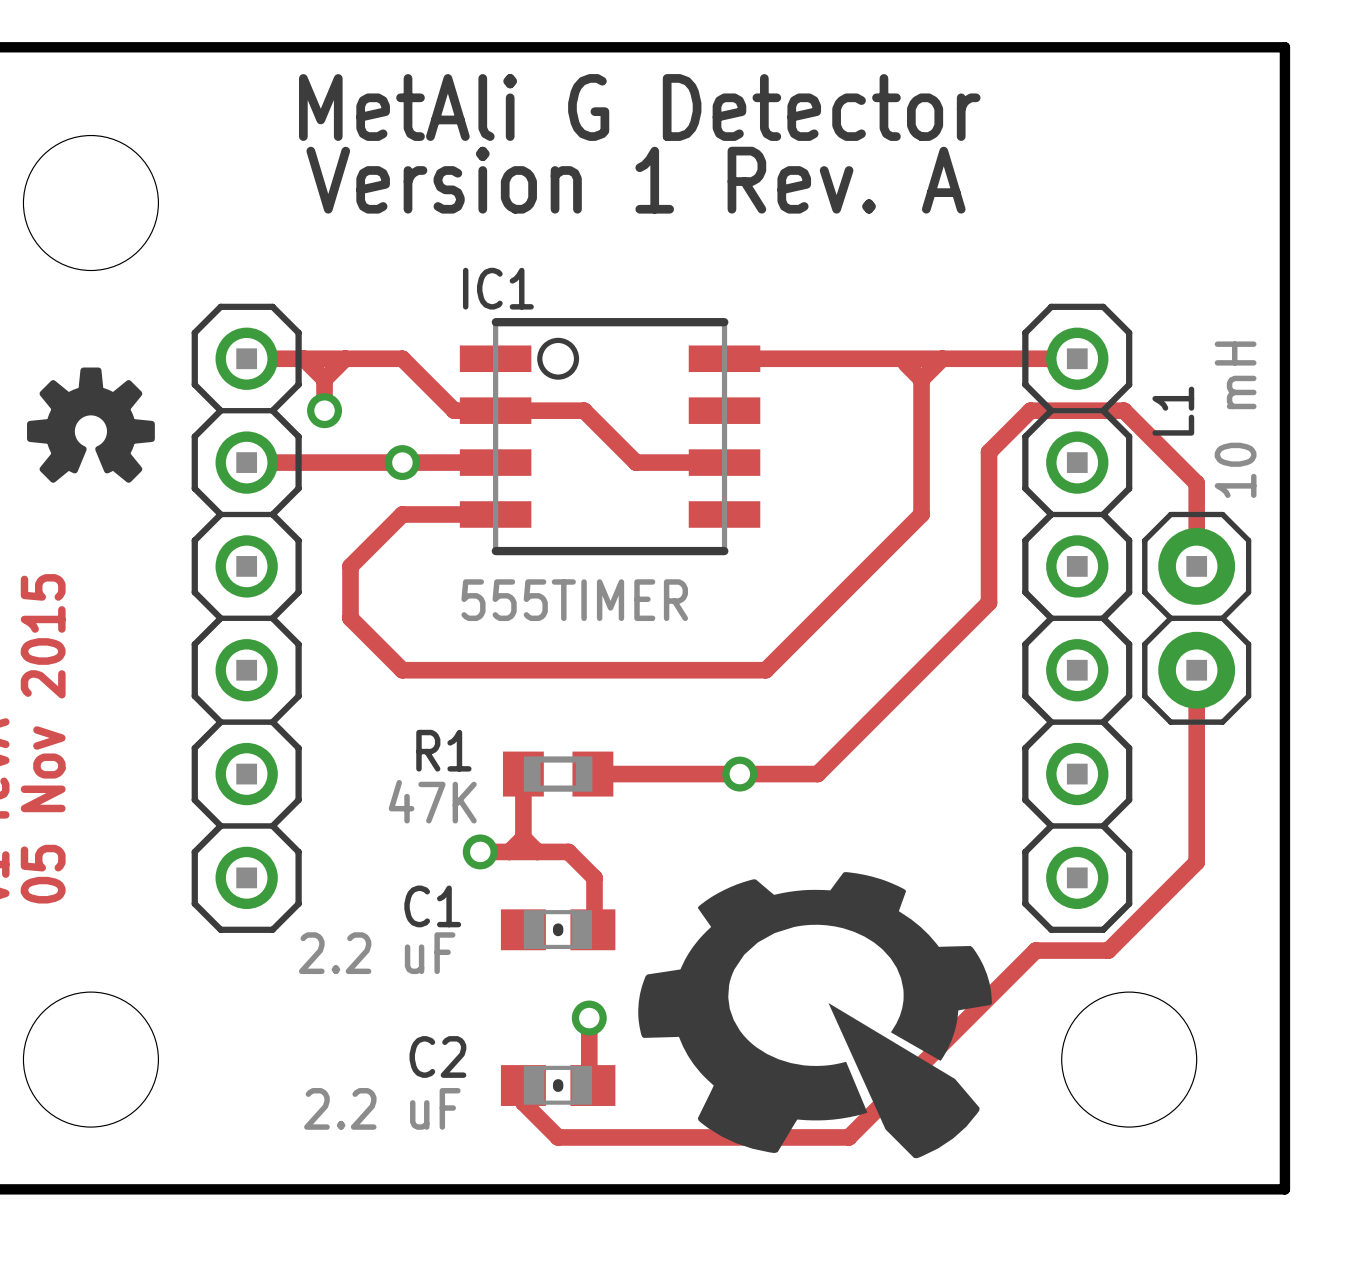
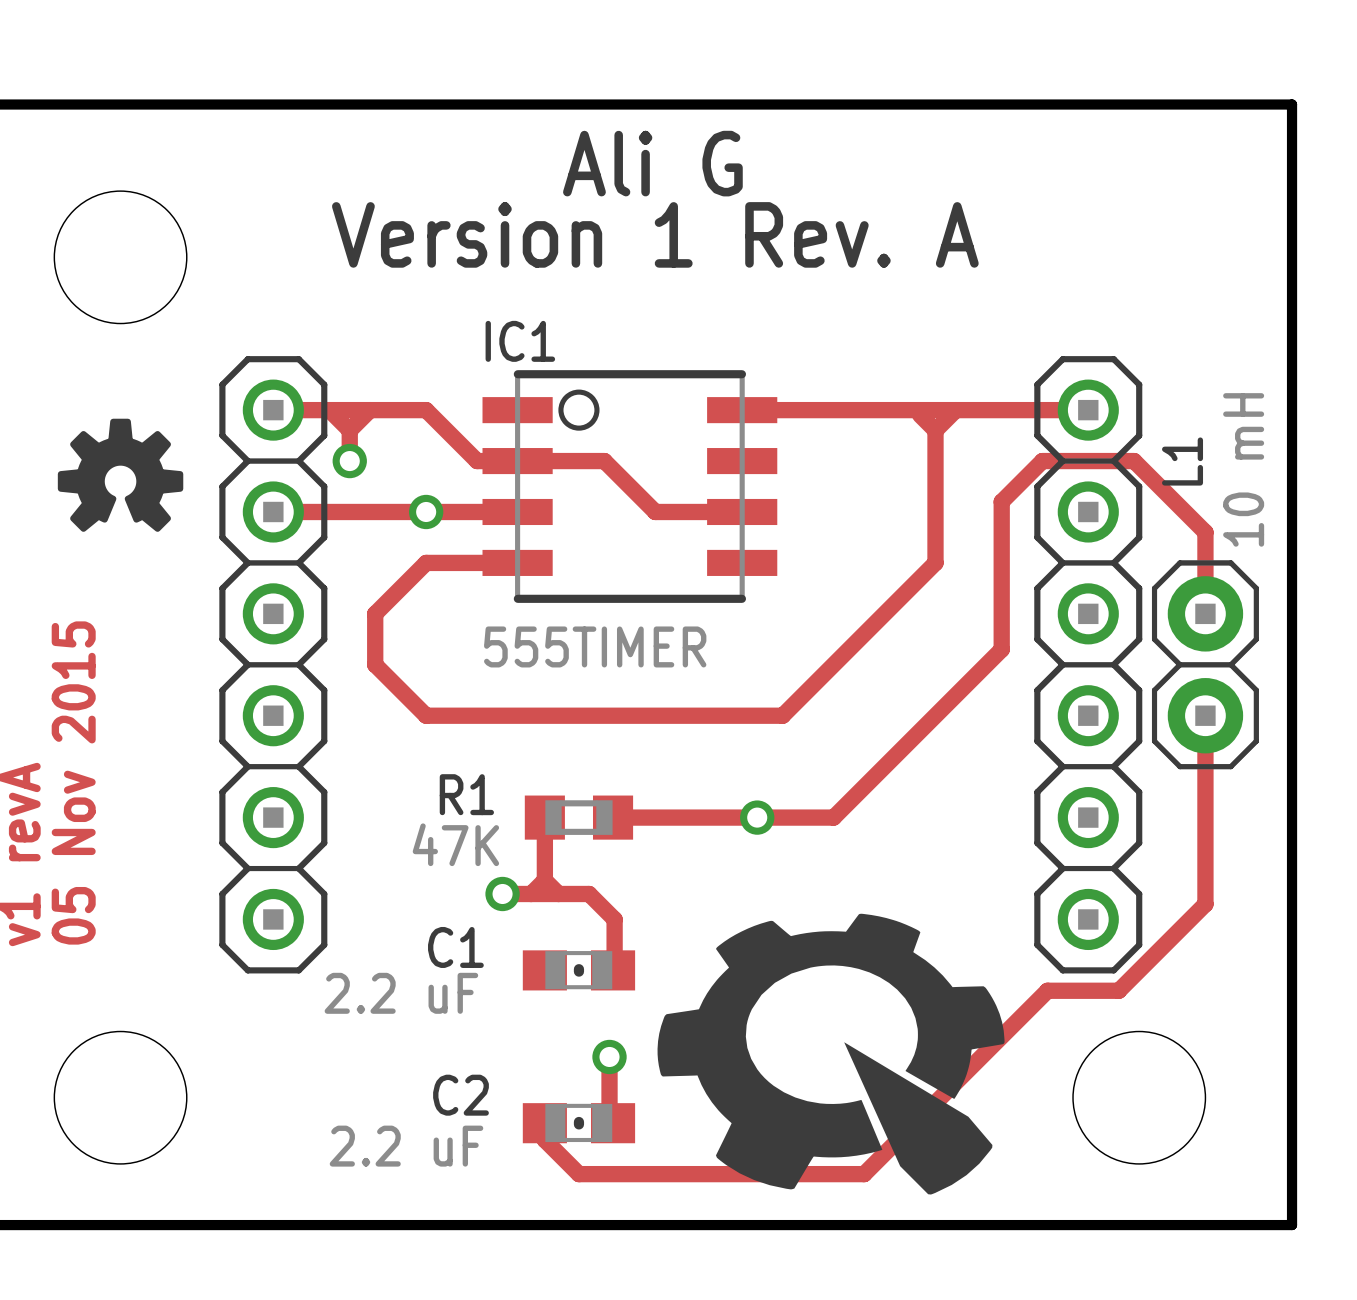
text: MetAli G Detector (639, 107) -> Ali G (652, 163)

